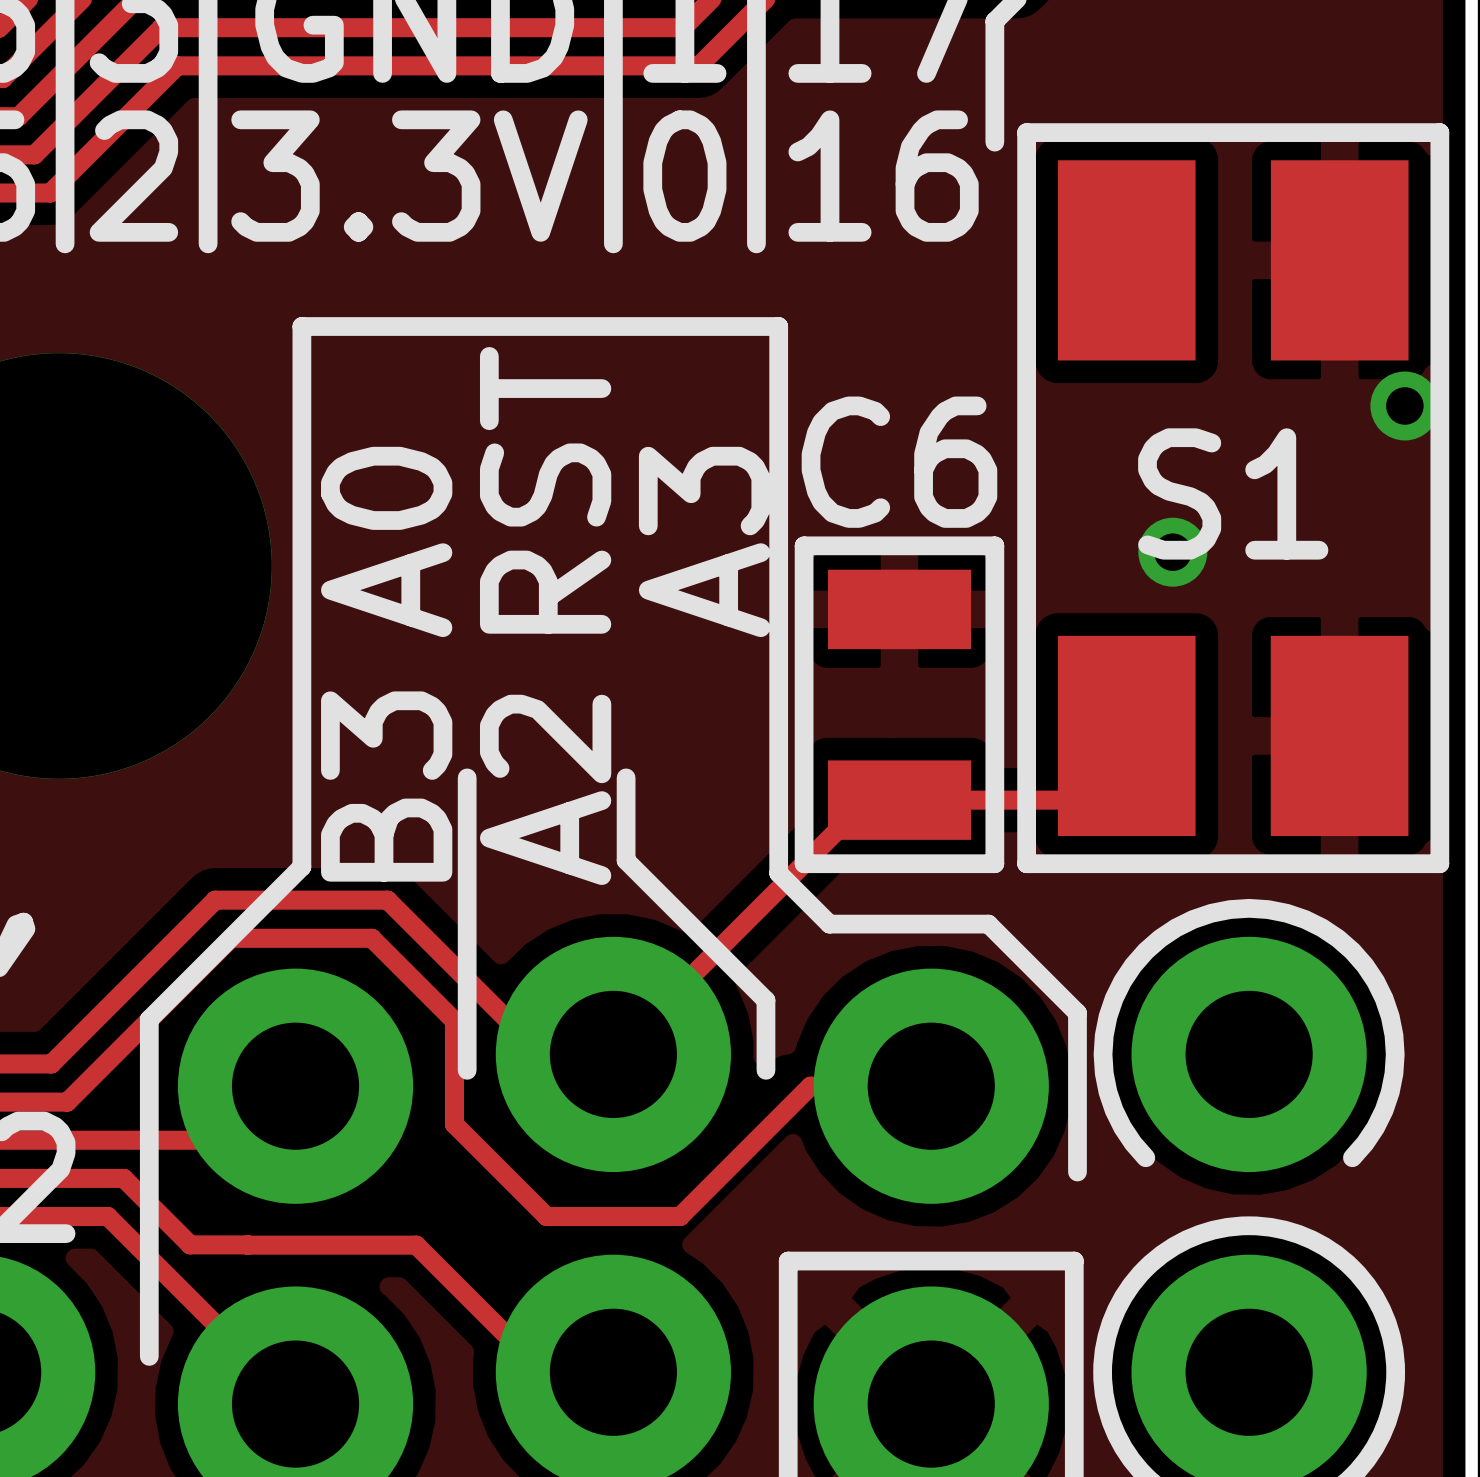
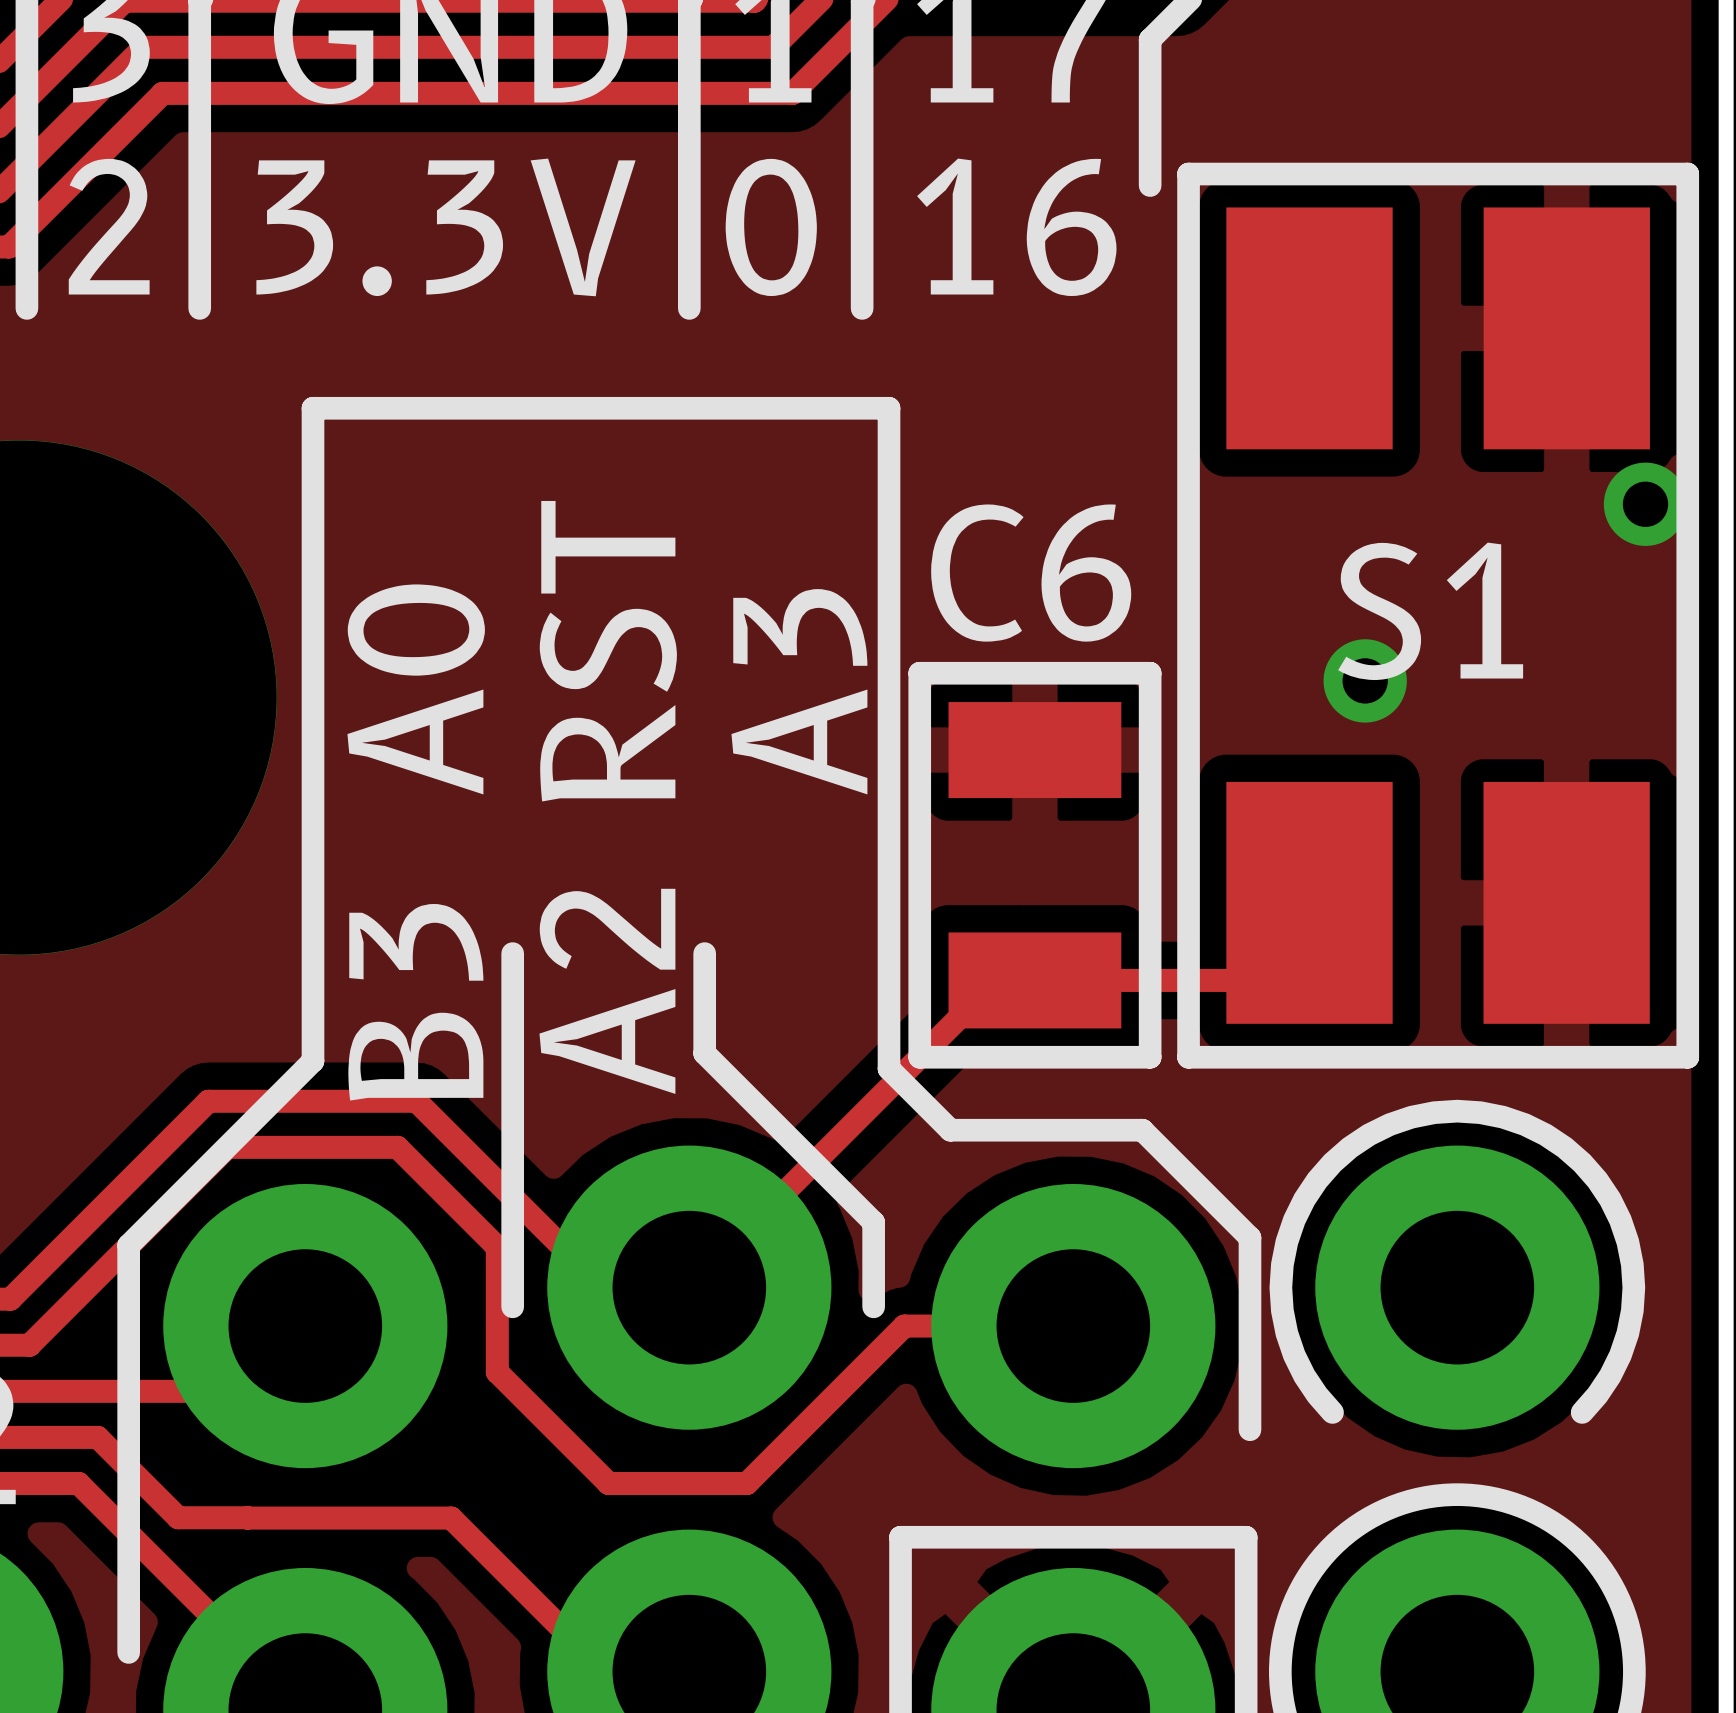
track: (810, 1086) (680, 1216) (661, 1216) -> (927, 1326) (904, 1326) (746, 1483)

